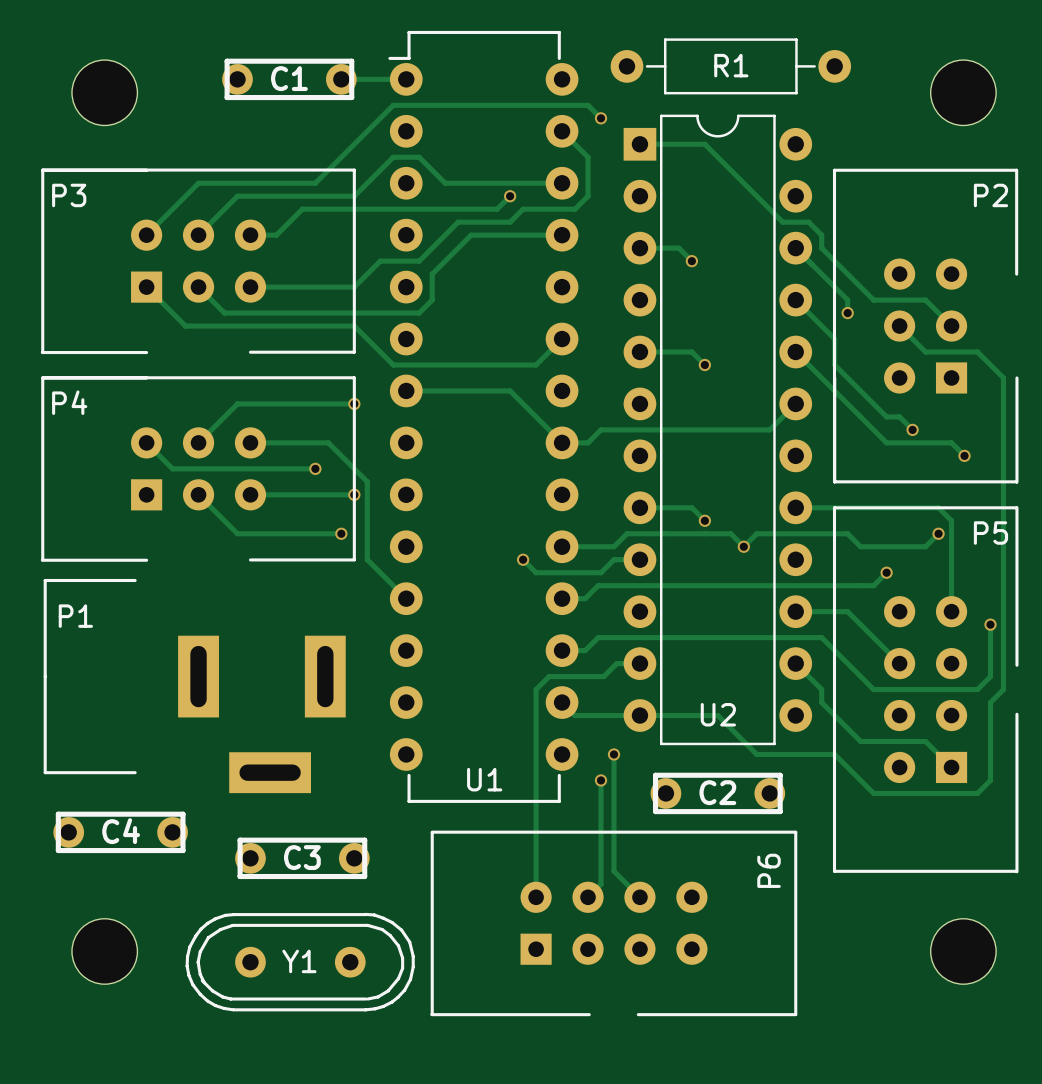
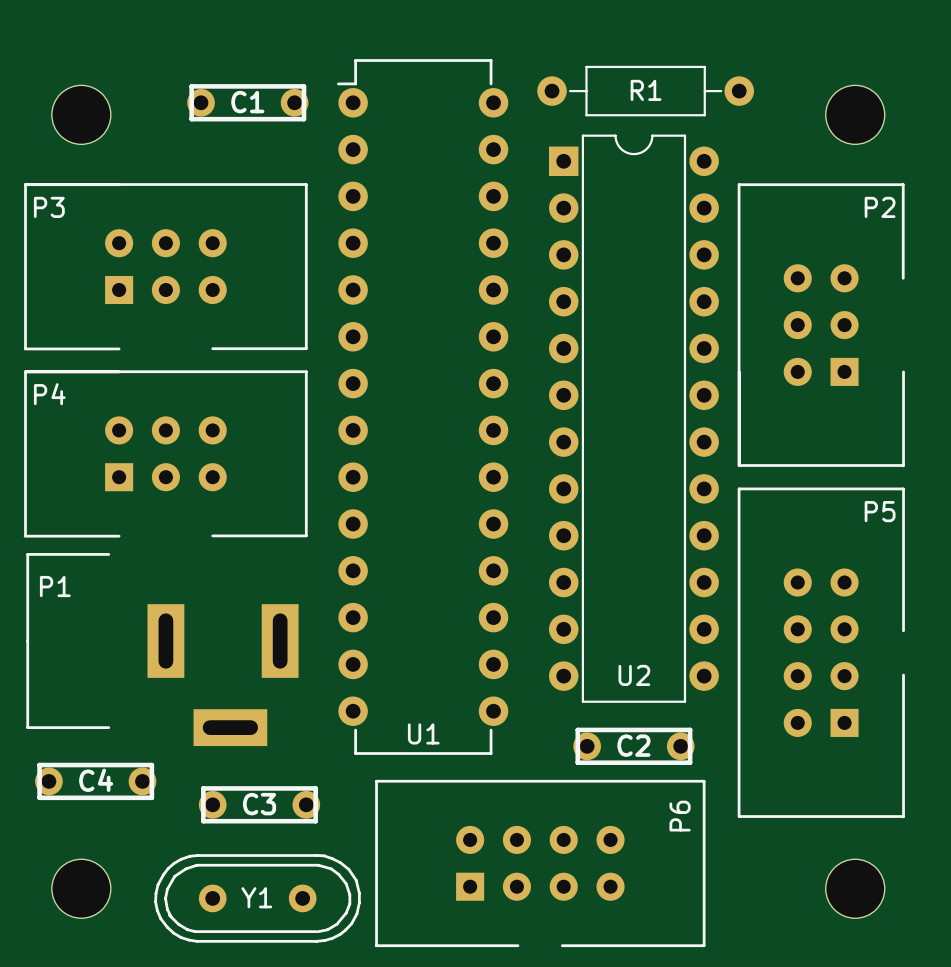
track: (341, 79) (406, 79) -> none
track: (601, 118) (588, 105) (393, 105) (315, 183) (198, 183) (146, 235) -> none
via: (601, 118) -> none
track: (562, 131) (588, 157) (588, 196) (575, 209) (523, 209) (510, 222) (458, 222) (419, 261) (380, 261) (354, 287) (250, 287) -> none
track: (639, 144) (704, 144) (782, 222) (808, 222) (821, 235) (821, 248) (873, 300) (925, 300) (951, 326) -> none
track: (562, 183) (445, 183) (419, 157) (393, 157) (354, 196) (237, 196) (198, 235) -> none
track: (510, 196) (497, 209) (302, 209) (276, 235) (250, 235) -> none
via: (510, 196) -> none
track: (562, 235) (471, 235) (432, 274) (432, 300) (419, 313) (224, 313) (198, 287) -> none
track: (639, 248) (678, 248) (691, 261) -> none
track: (795, 248) (847, 300) (847, 313) -> none
via: (691, 261) -> none
track: (146, 287) (185, 326) (354, 326) (393, 364) (536, 364) (562, 339) -> none
track: (795, 300) (834, 339) (834, 364) (886, 416) (899, 416) (912, 429) -> none
via: (847, 313) -> none
track: (899, 326) (925, 352) (977, 352) (1003, 377) (1003, 689) (990, 702) (990, 780) (977, 793) (873, 793) (834, 754) (756, 754) (717, 715) (575, 715) (562, 702) -> none
track: (639, 352) (691, 352) (704, 364) -> none
track: (795, 352) (886, 442) (951, 442) (964, 455) -> none
via: (704, 364) -> none
track: (406, 390) (510, 390) (562, 442) (588, 442) (601, 429) (769, 429) (795, 403) -> none
track: (354, 403) (237, 403) (198, 442) -> none
via: (354, 403) -> none
via: (912, 429) -> none
track: (146, 442) (172, 468) (315, 468) -> none
track: (250, 442) (328, 442) (367, 481) (367, 559) (406, 598) -> none
via: (964, 455) -> none
via: (315, 468) -> none
track: (198, 494) (237, 533) (341, 533) -> none
track: (250, 494) (354, 494) -> none
via: (354, 494) -> none
track: (639, 507) (691, 507) (704, 520) -> none
track: (795, 507) (938, 507) (951, 520) (951, 611) -> none
via: (704, 520) -> none
via: (341, 533) -> none
track: (938, 533) (925, 546) (860, 546) (847, 533) (756, 533) (743, 546) (730, 533) (626, 533) (613, 546) (562, 546) -> none
via: (938, 533) -> none
via: (743, 546) -> none
track: (523, 559) (536, 572) (601, 572) (613, 559) (639, 559) -> none
via: (523, 559) -> none
track: (886, 572) (873, 585) (598, 585) (585, 598) (562, 598) -> none
via: (886, 572) -> none
track: (795, 611) (847, 611) (899, 663) -> none
track: (990, 624) (990, 676) (977, 689) (873, 689) (821, 637) (598, 637) (585, 650) (562, 650) -> none
via: (990, 624) -> none
track: (639, 663) (616, 663) (603, 676) (549, 676) (536, 689) (536, 897) -> none
track: (795, 663) (821, 689) (821, 702) (860, 741) (925, 741) (951, 767) -> none
track: (613, 754) (613, 871) (639, 897) -> none
via: (613, 754) -> none
track: (601, 780) (601, 884) (588, 897) -> none
via: (601, 780) -> none

